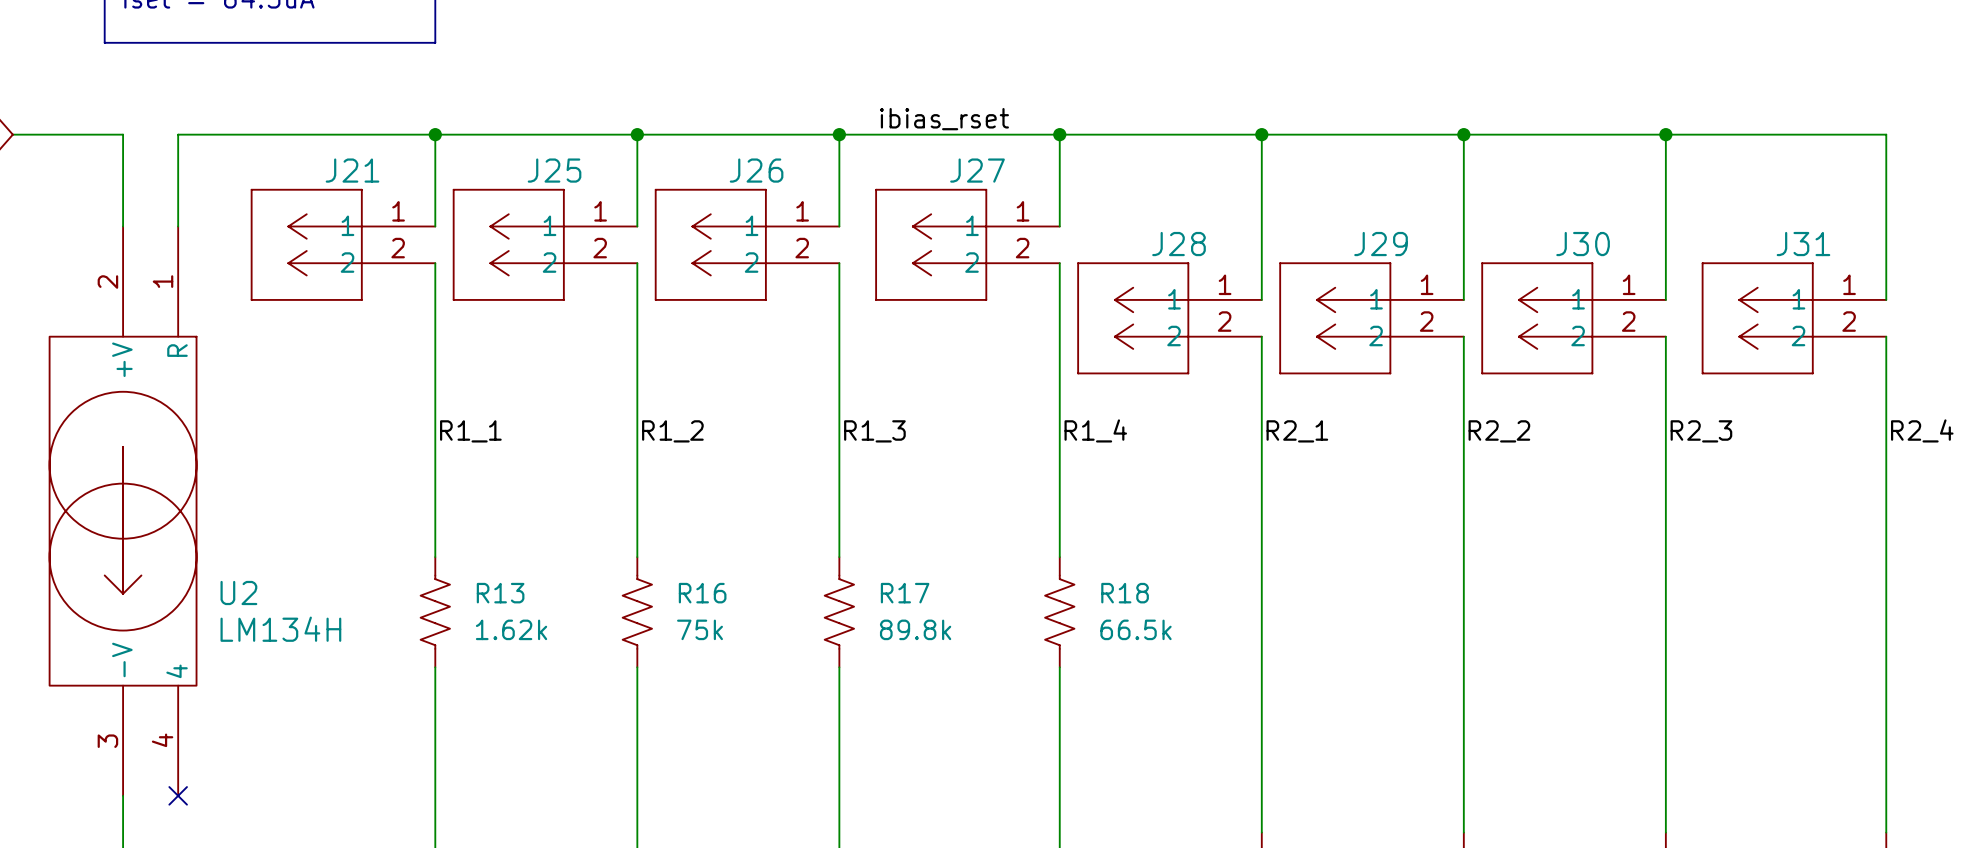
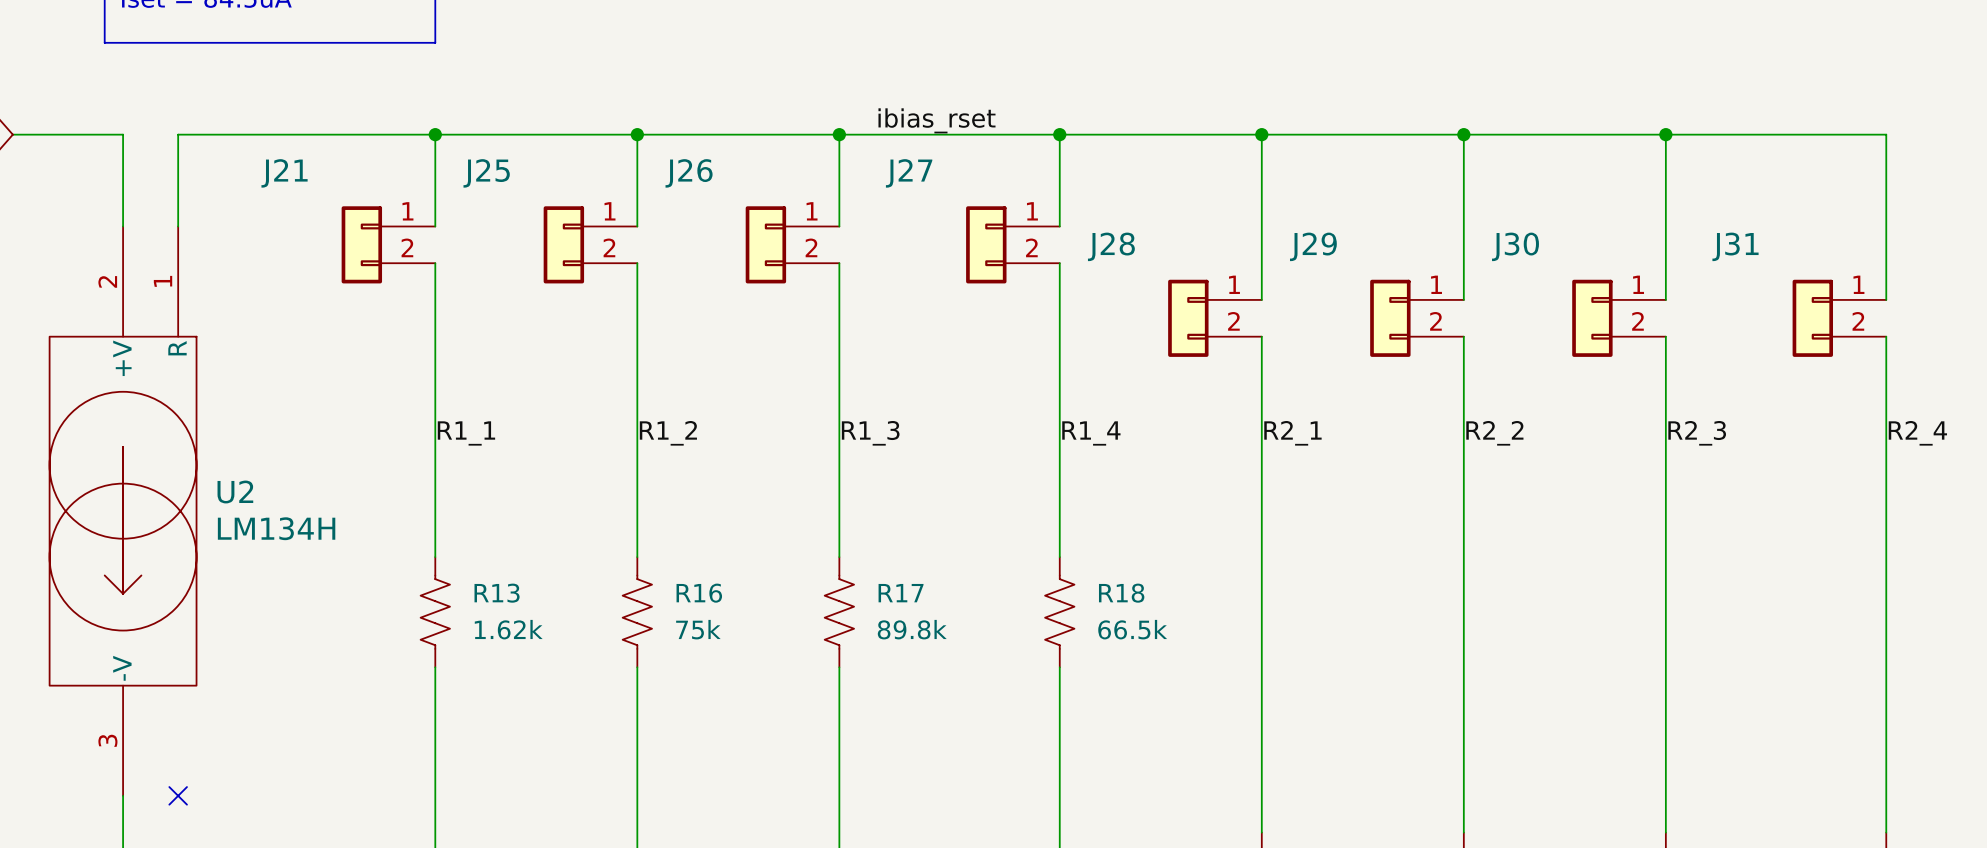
J21 name position: J21 (352, 170) -> J21 (284, 173)
J25 name position: J25 (554, 170) -> J25 (486, 173)
J26 name position: J26 (756, 170) -> J26 (689, 173)
J27 name position: J27 (977, 170) -> J27 (909, 173)
J21 symbol: [250, 188, 436, 301] -> [341, 206, 436, 284]
J25 symbol: [452, 188, 638, 301] -> [543, 206, 638, 284]
J26 symbol: [654, 188, 840, 301] -> [745, 206, 840, 284]
J27 symbol: [875, 188, 1060, 301] -> [966, 206, 1060, 284]
U2 symbol: [49, 226, 197, 796] -> [49, 226, 197, 796]
J28 name position: J28 (1179, 244) -> J28 (1111, 246)
J29 name position: J29 (1381, 244) -> J29 (1313, 246)
J30 name position: J30 (1583, 244) -> J30 (1515, 246)
J31 name position: J31 (1803, 244) -> J31 (1735, 246)
J28 symbol: [1077, 262, 1262, 375] -> [1168, 279, 1262, 357]
J29 symbol: [1279, 262, 1464, 375] -> [1370, 279, 1464, 357]
J30 symbol: [1481, 262, 1666, 375] -> [1572, 279, 1666, 357]
J31 symbol: [1701, 262, 1887, 375] -> [1792, 279, 1887, 357]
U2 name position: U2 (238, 592) -> U2 (235, 491)
U2 value position: LM134H (280, 629) -> LM134H (276, 528)

